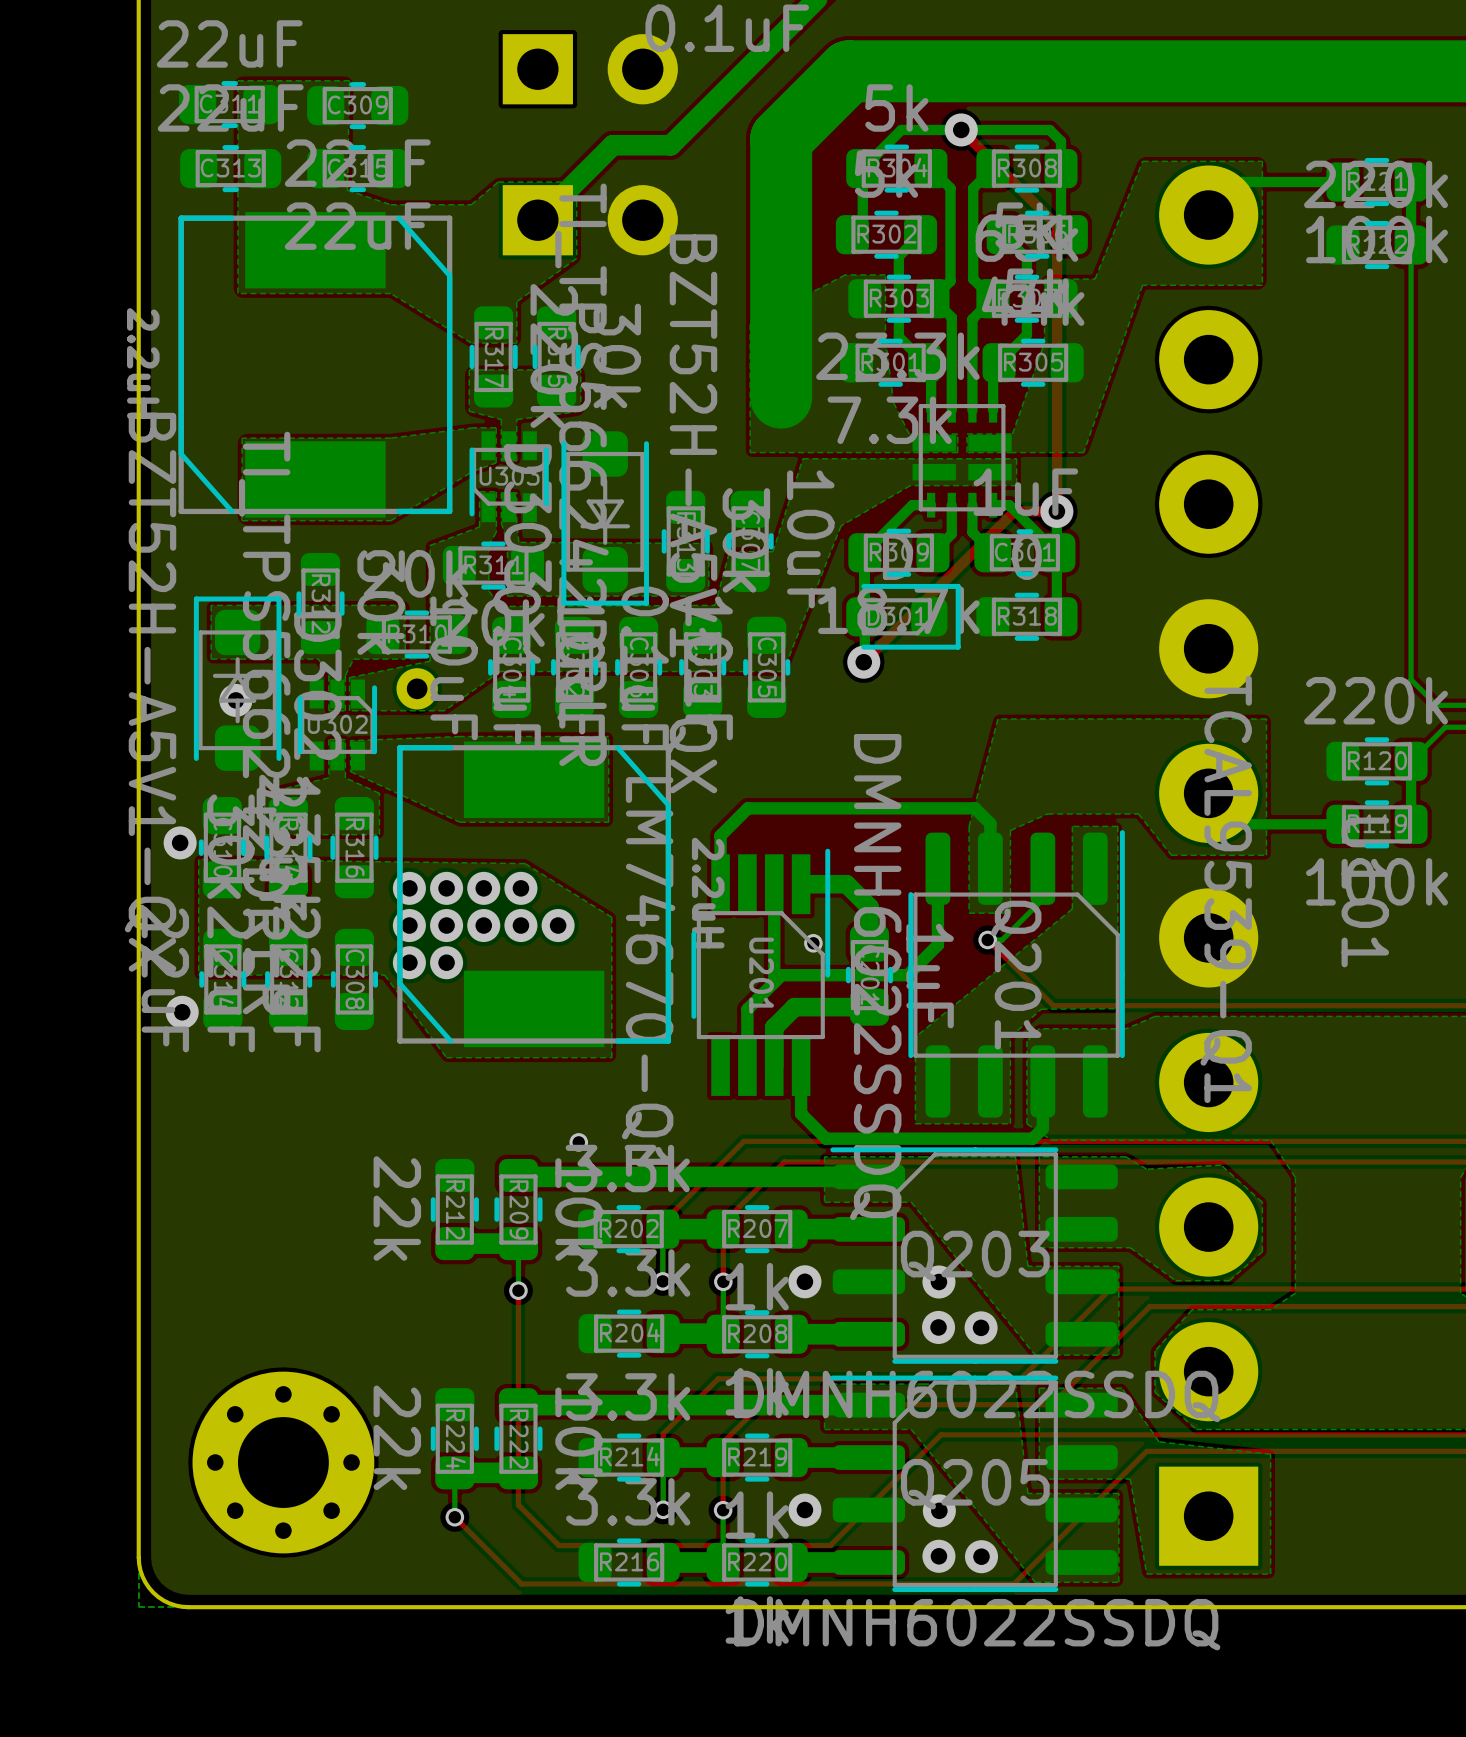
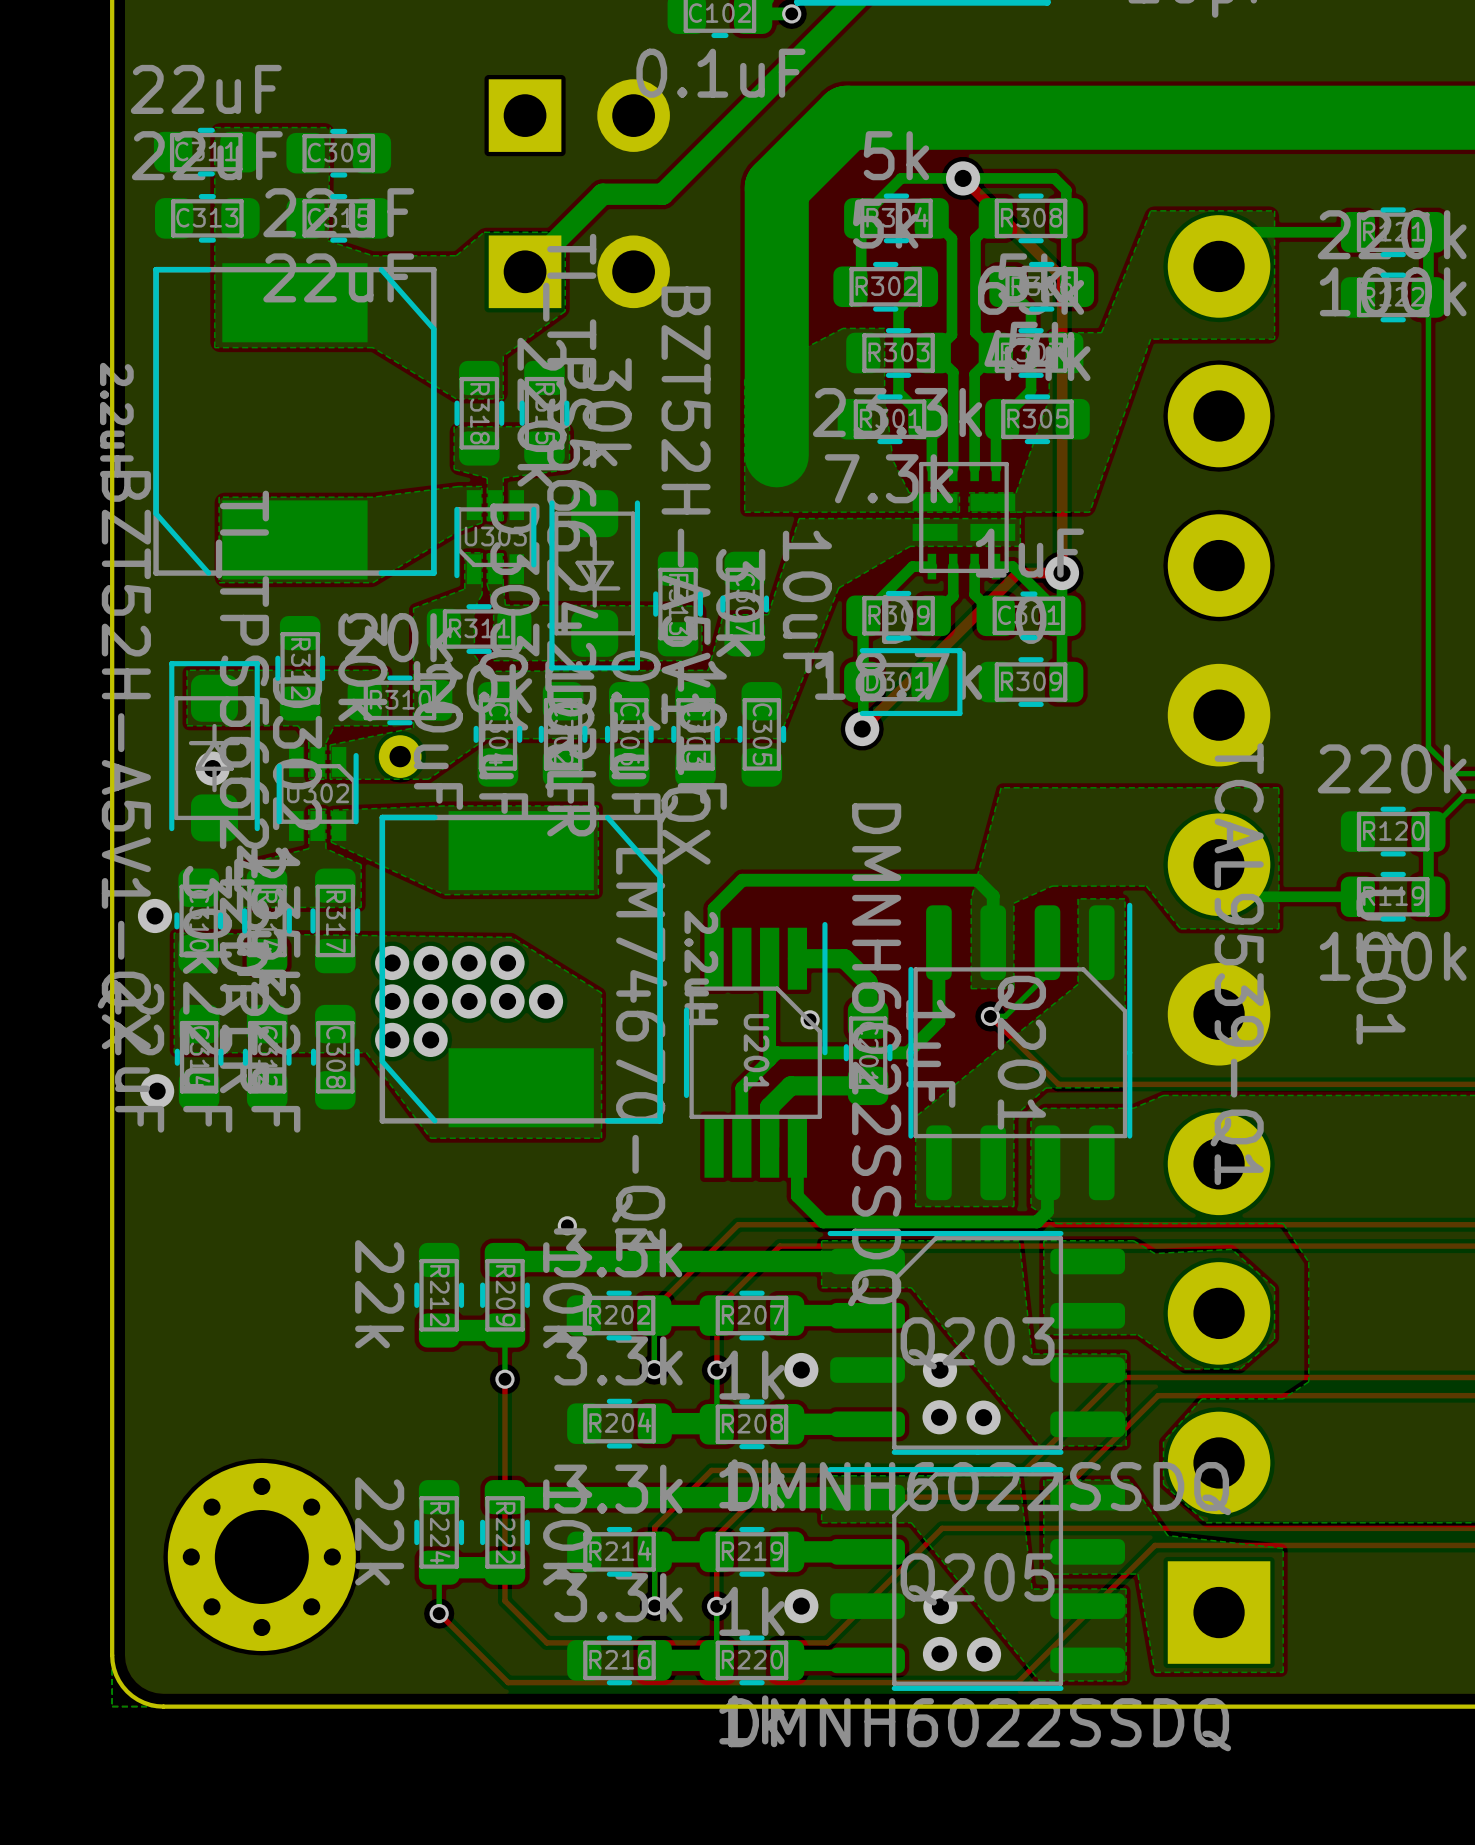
R317 name: R317 (494, 357) -> R318 (479, 413)
R318 name: R318 (1027, 616) -> R309 (1031, 681)
R316 name: R316 (355, 848) -> R317 (335, 921)

